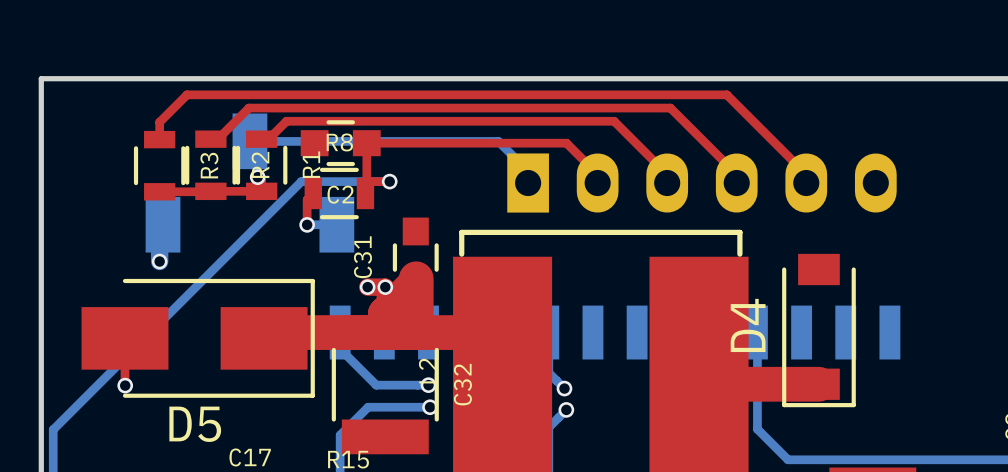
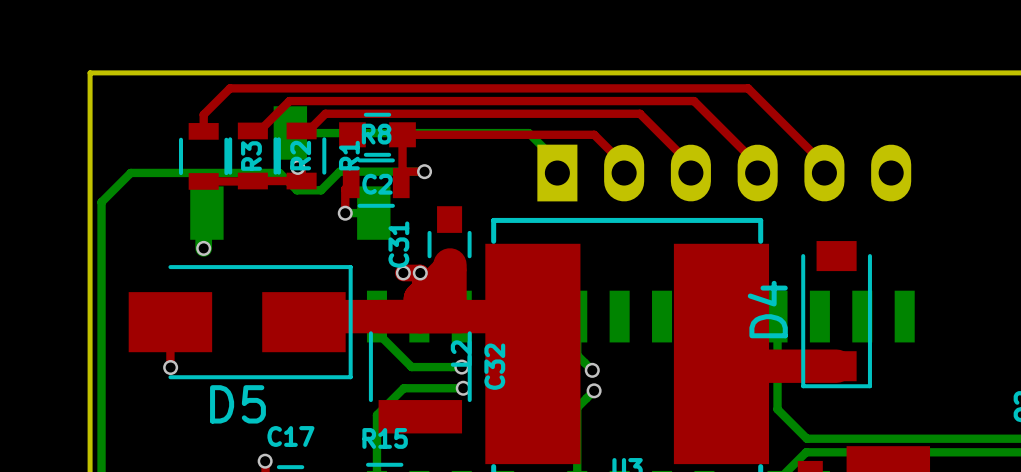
bottom track: (281, 201) (53, 429) -> (321, 190) (296, 190) (279, 172) (130, 172) (101, 202) (101, 409)

